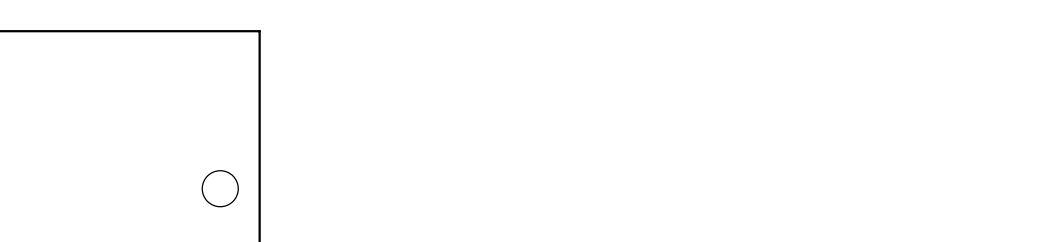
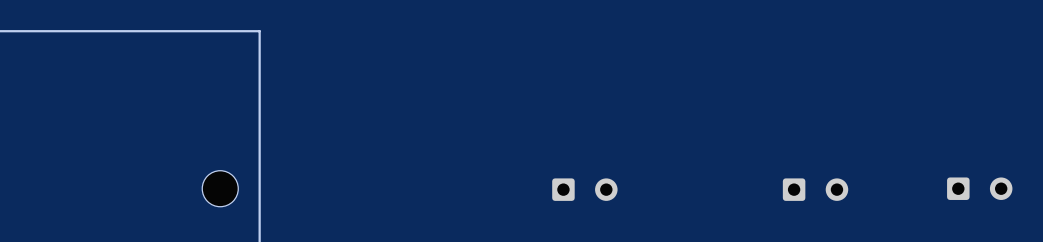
part: none -> (979, 188)
part: none -> (584, 189)
part: none -> (815, 189)

